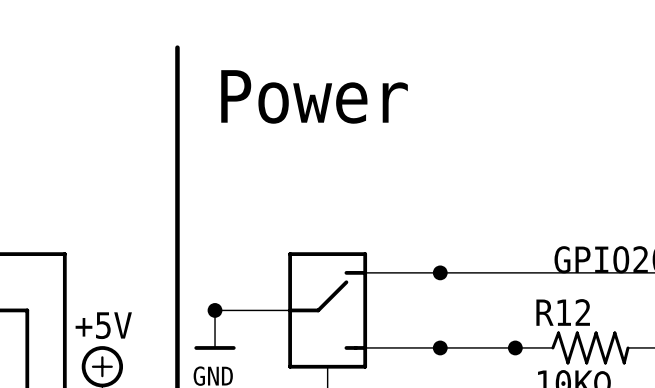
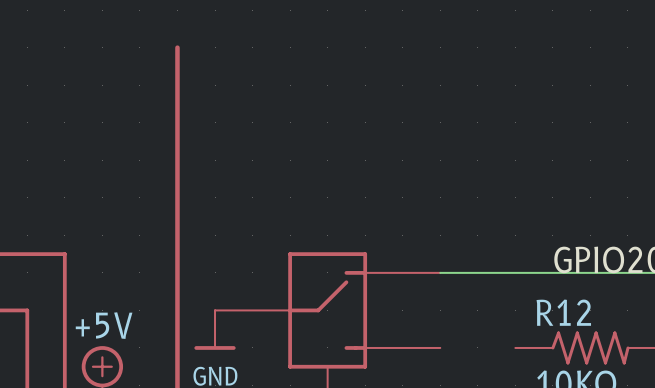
text: Power (314, 96) -> none
junction: (440, 272) -> none
junction: (215, 310) -> none
wire: (440, 347) (515, 347) -> none
junction: (440, 347) -> none
junction: (515, 347) -> none

